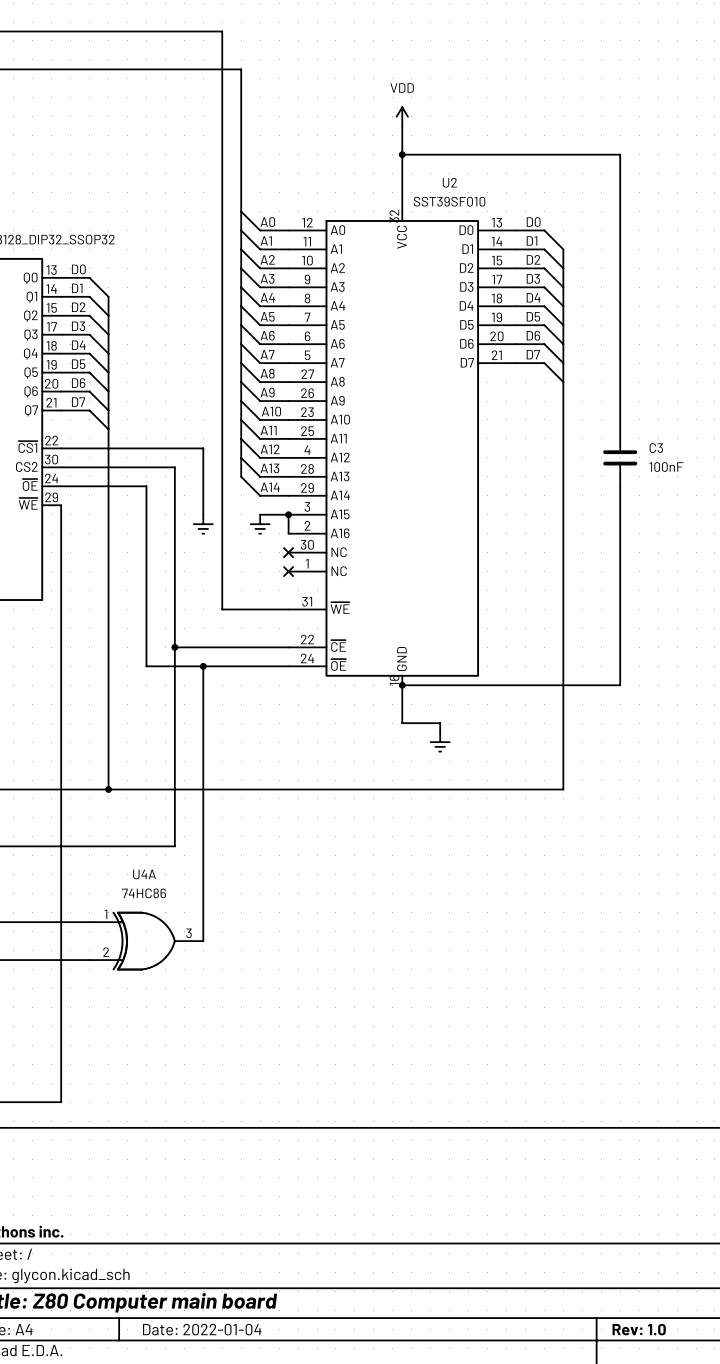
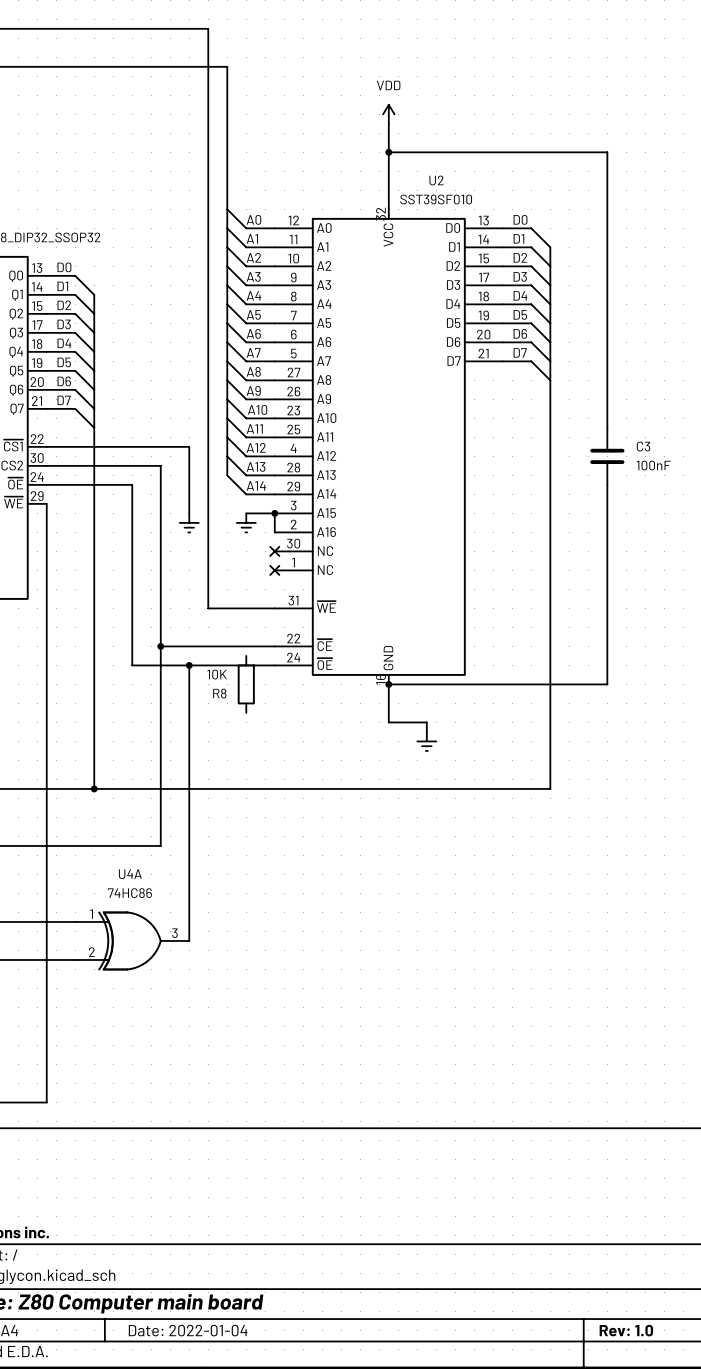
R8: none -> 10K (246, 684)

